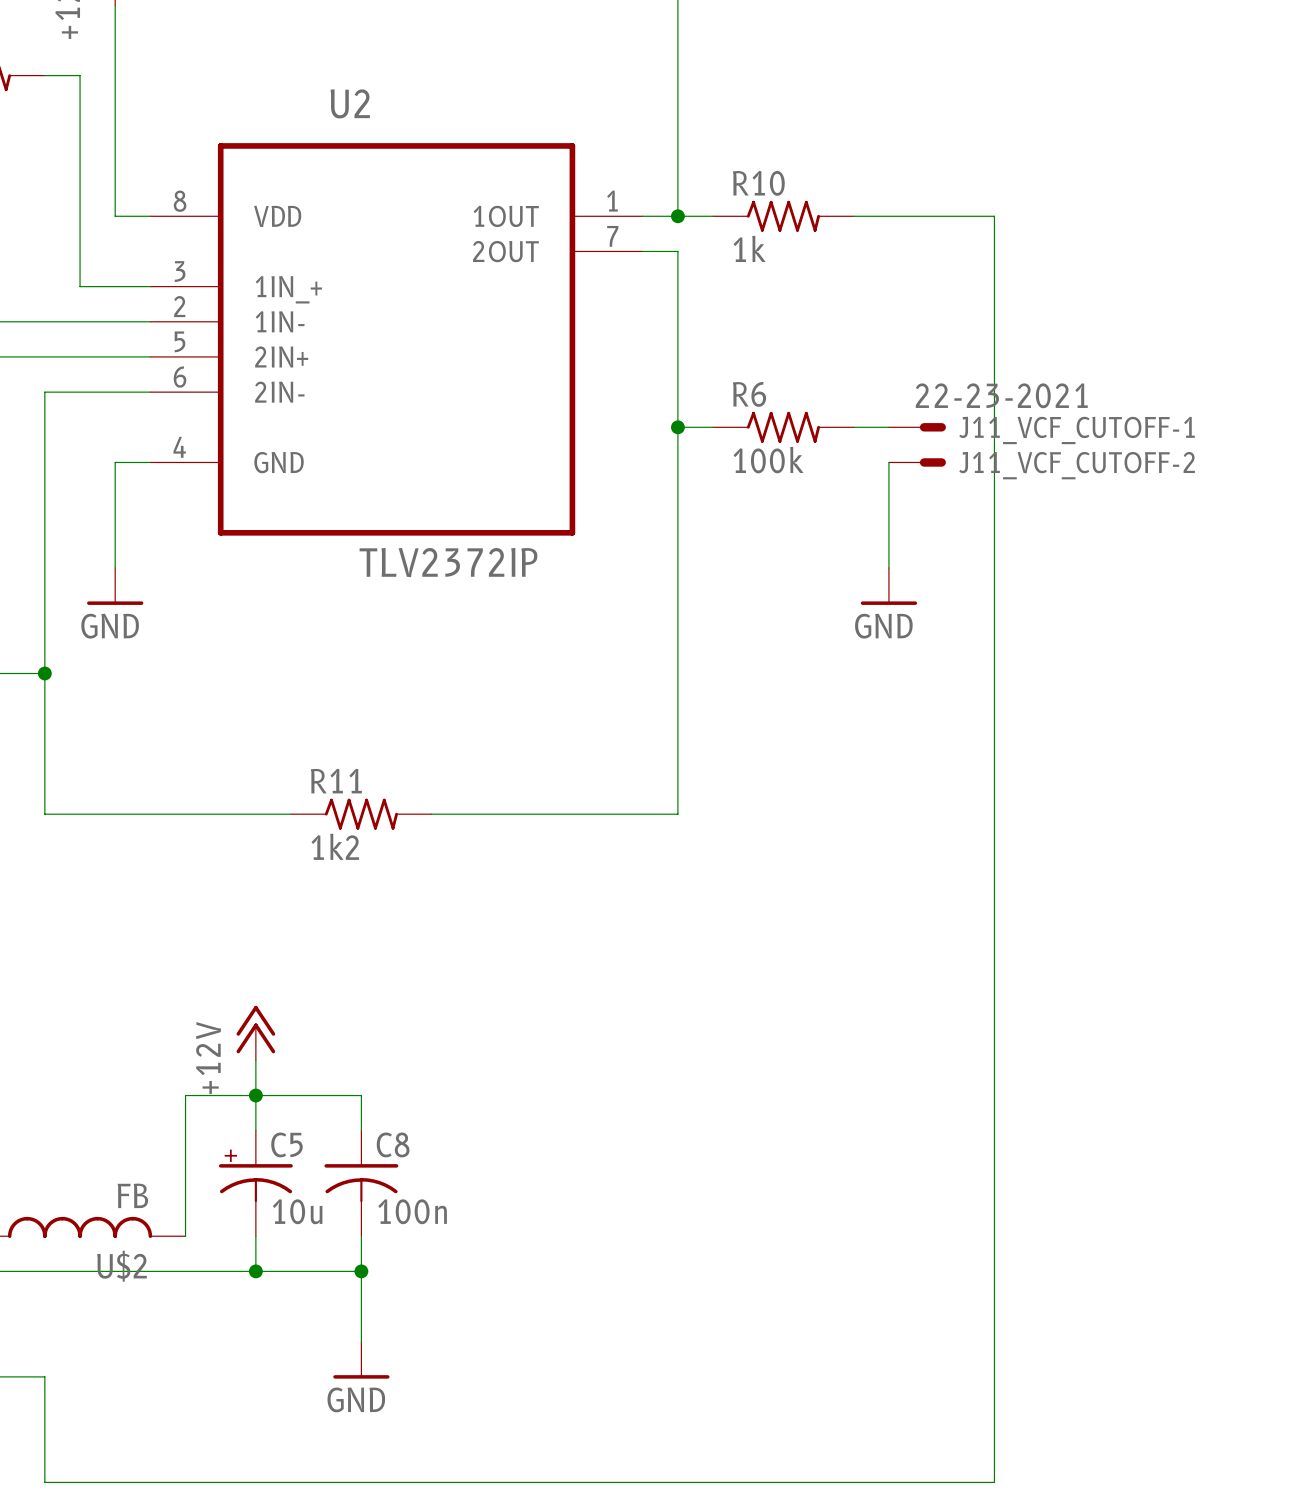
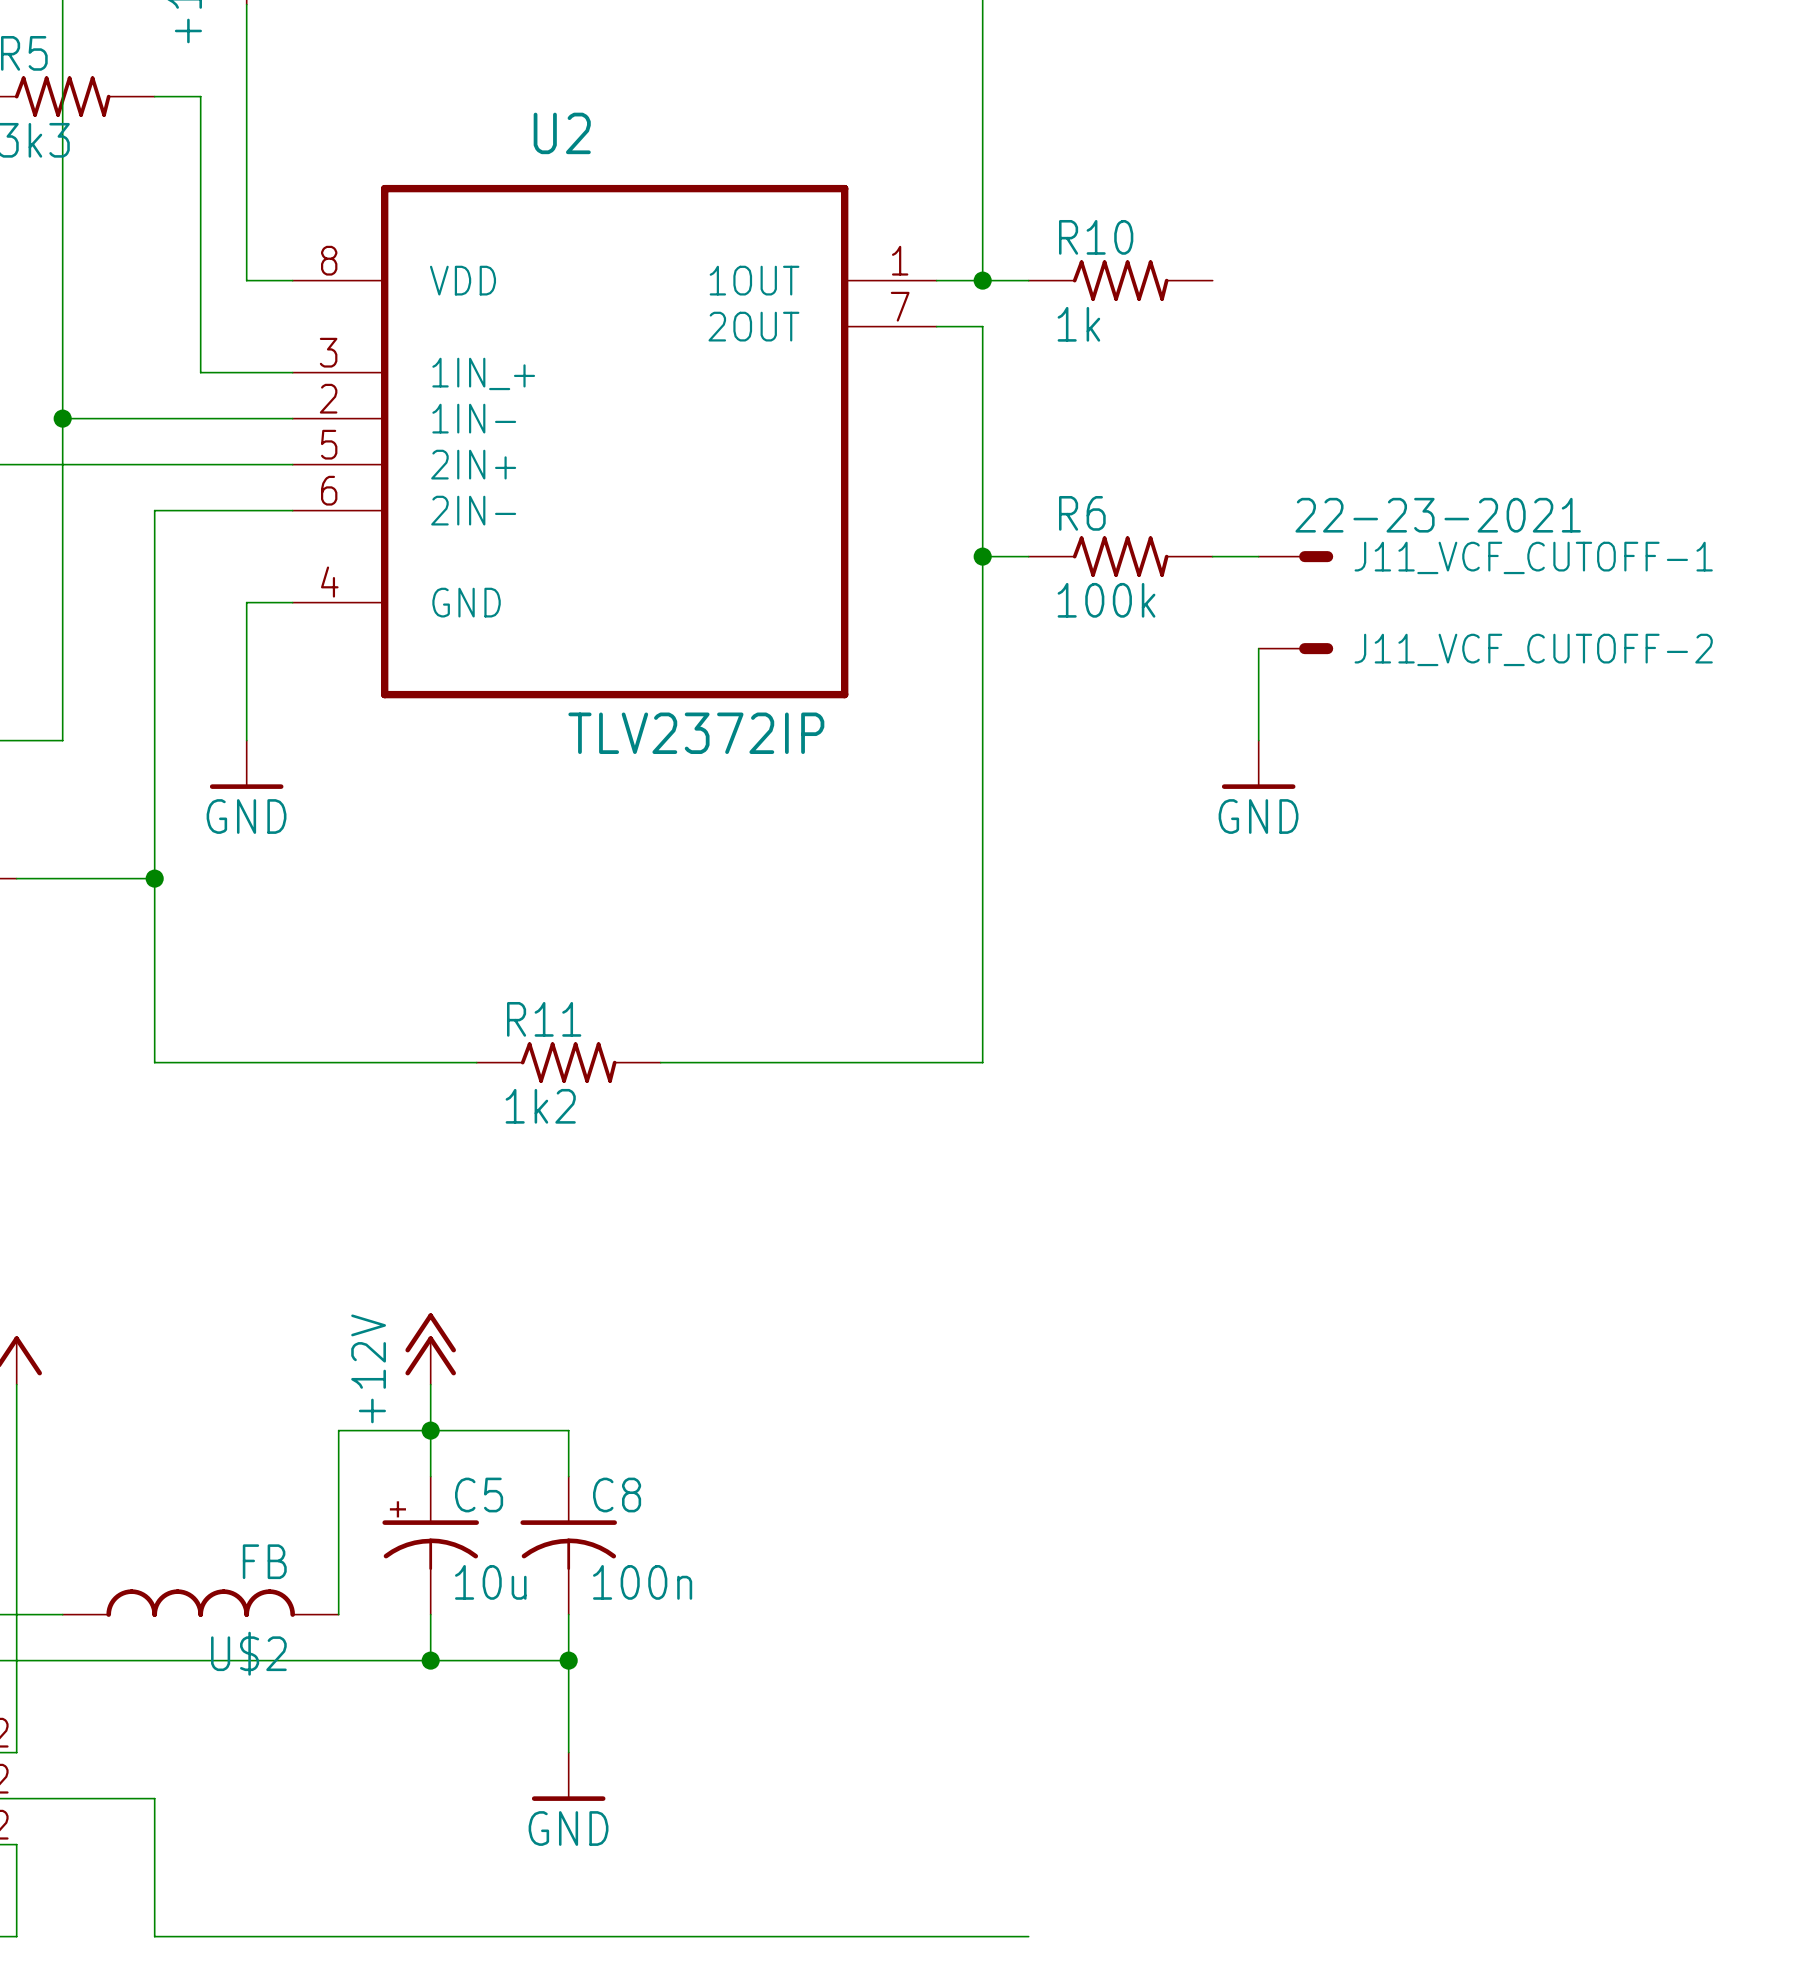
wire: (853, 216) (994, 216) (994, 1482) (713, 1482) -> none
wire: (888, 462) (888, 497) -> none
J11_VCF_CUTOFF-2 position: (917, 462) -> (1295, 648)

